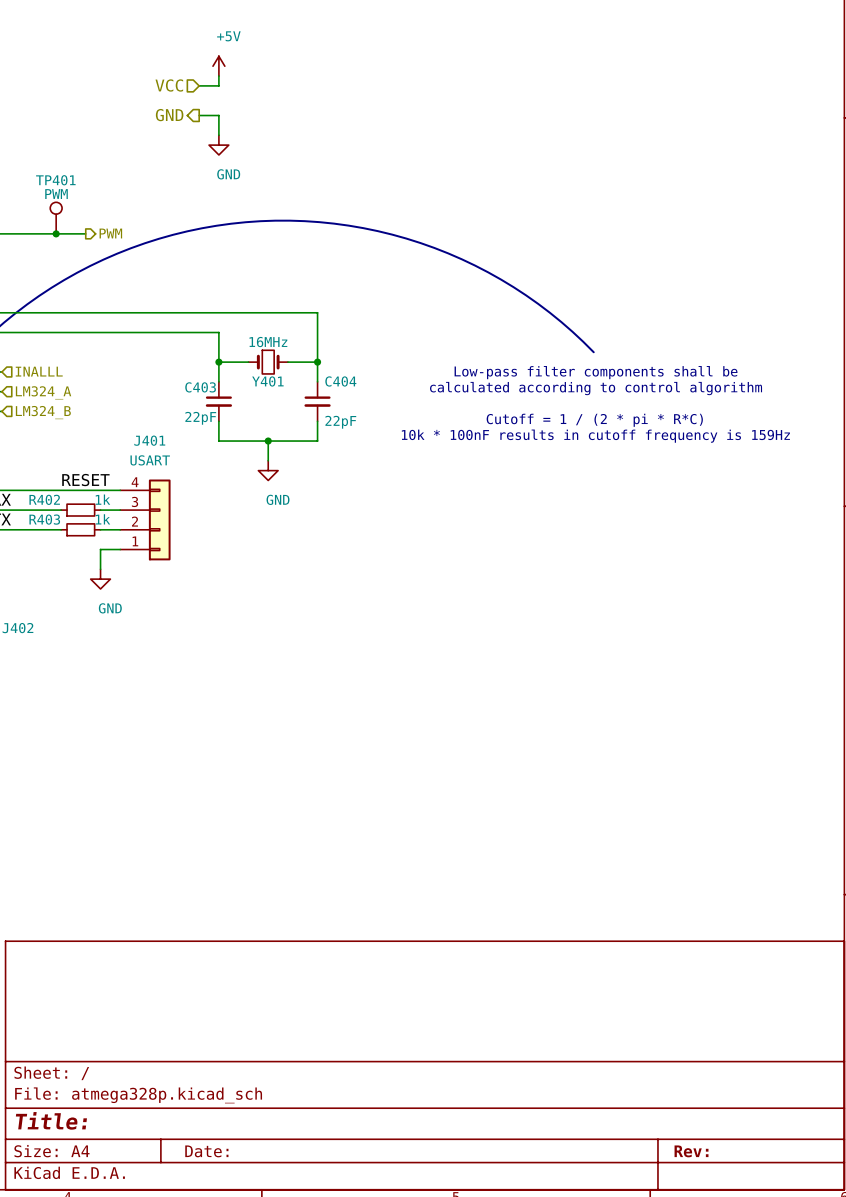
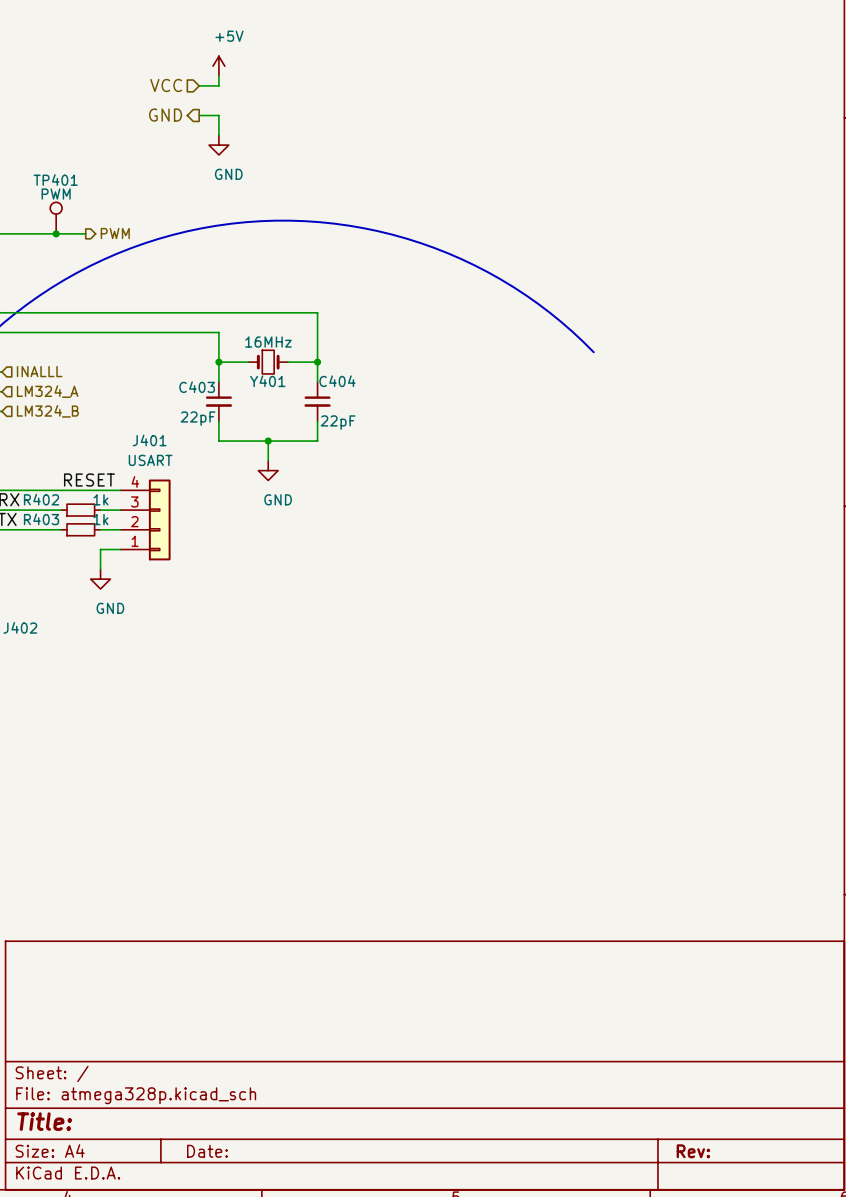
text: Low-pass filter components shall be (596, 372) -> none
text: calculated according to control algorithm (596, 388) -> none
text: Cutoff = 1 / (2 * pi * R*C) (594, 420) -> none
text: 10k * 100nF results in cutoff frequency is 159Hz (595, 436) -> none

